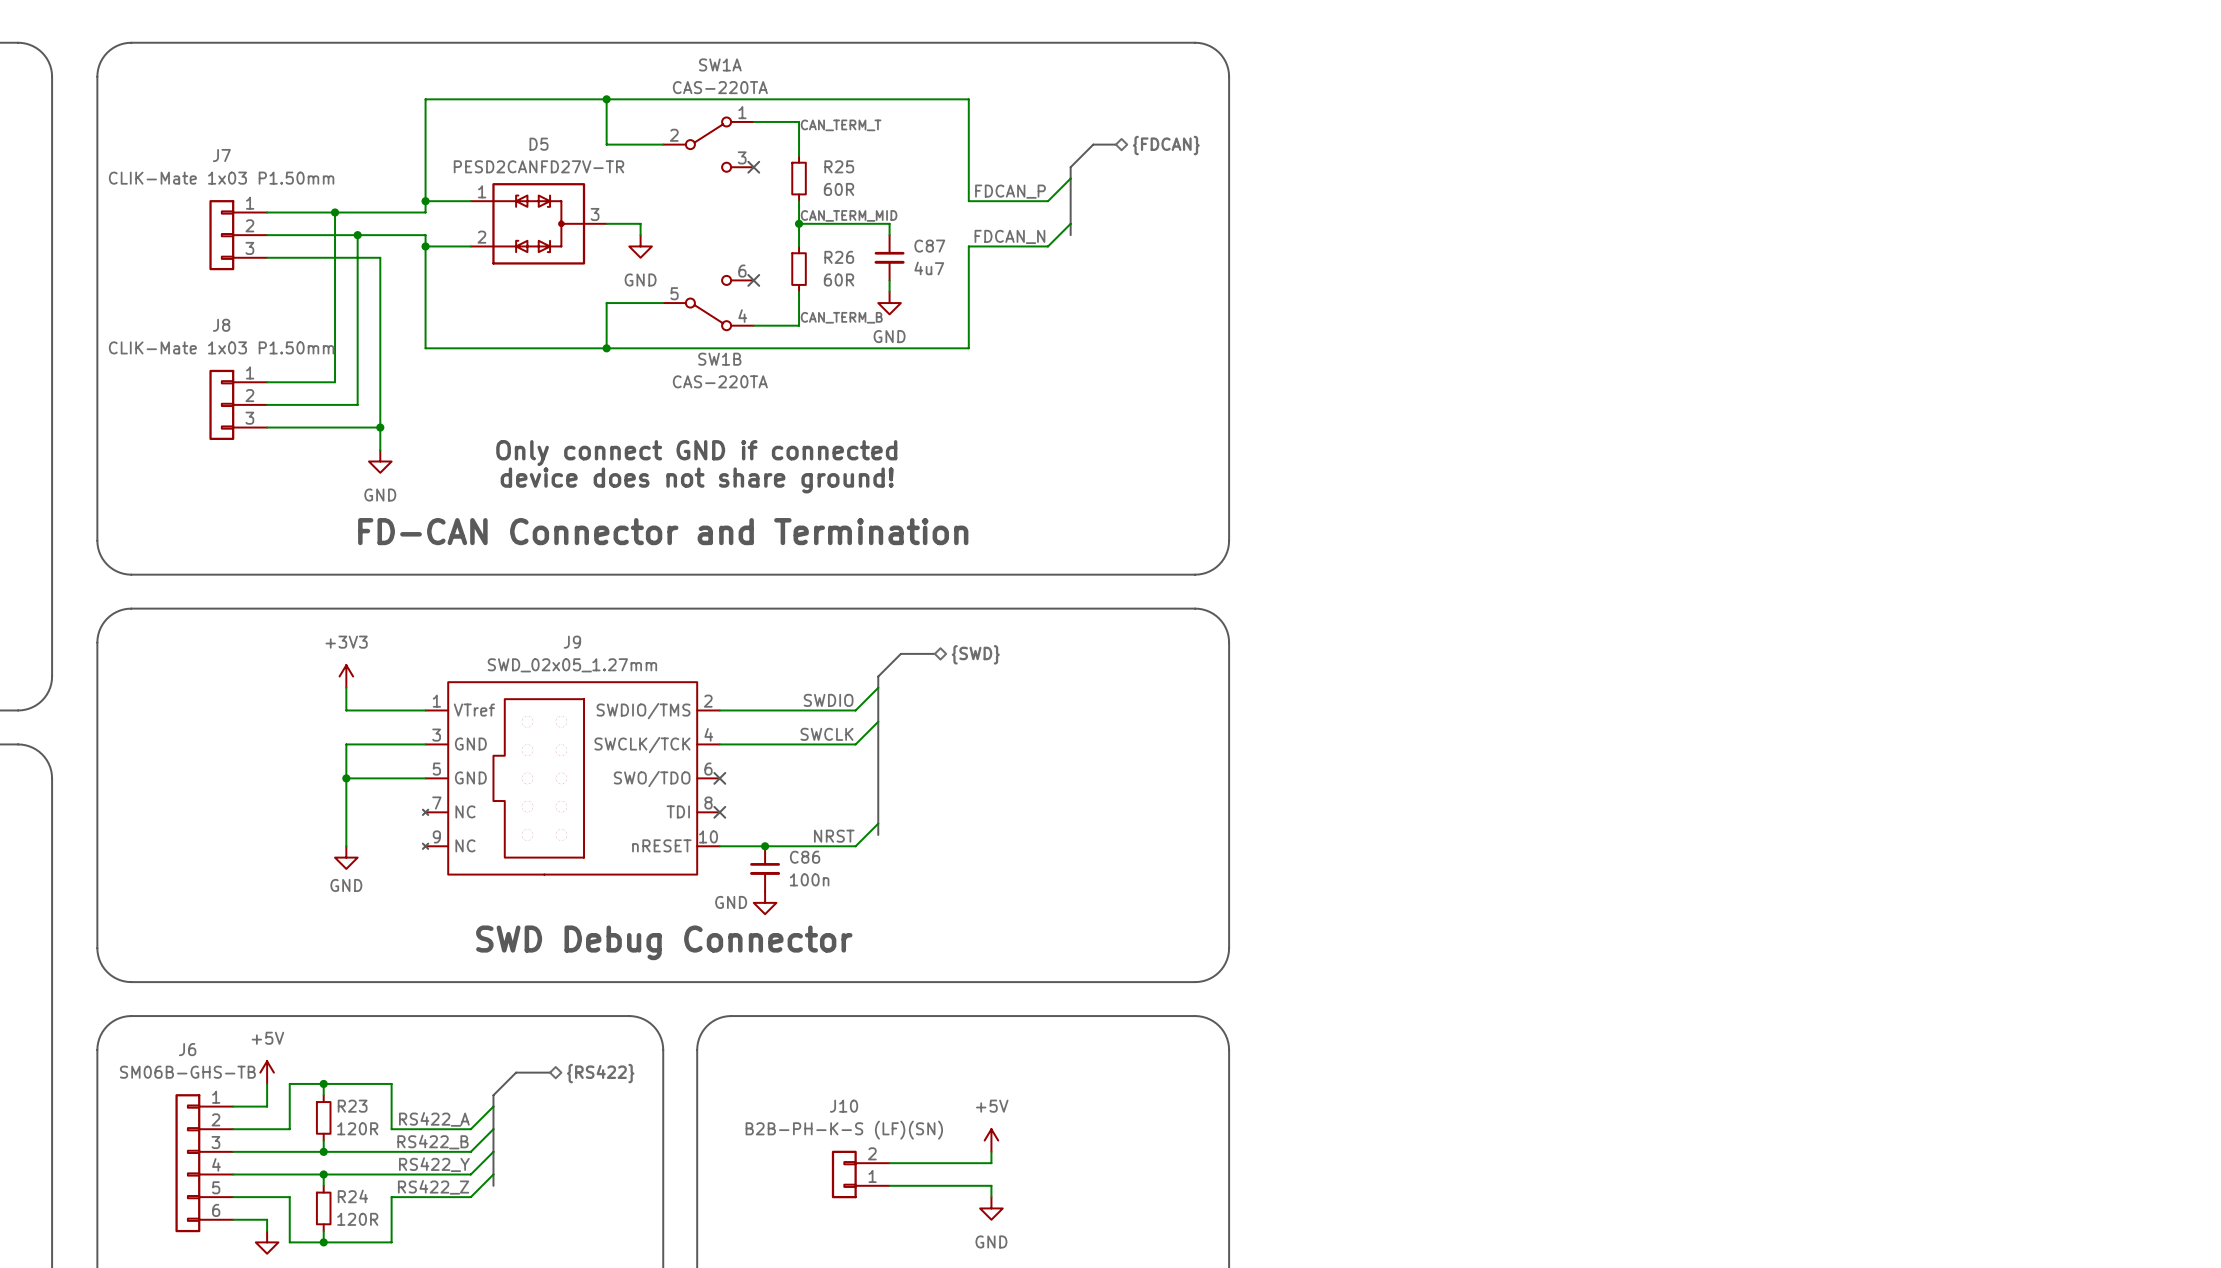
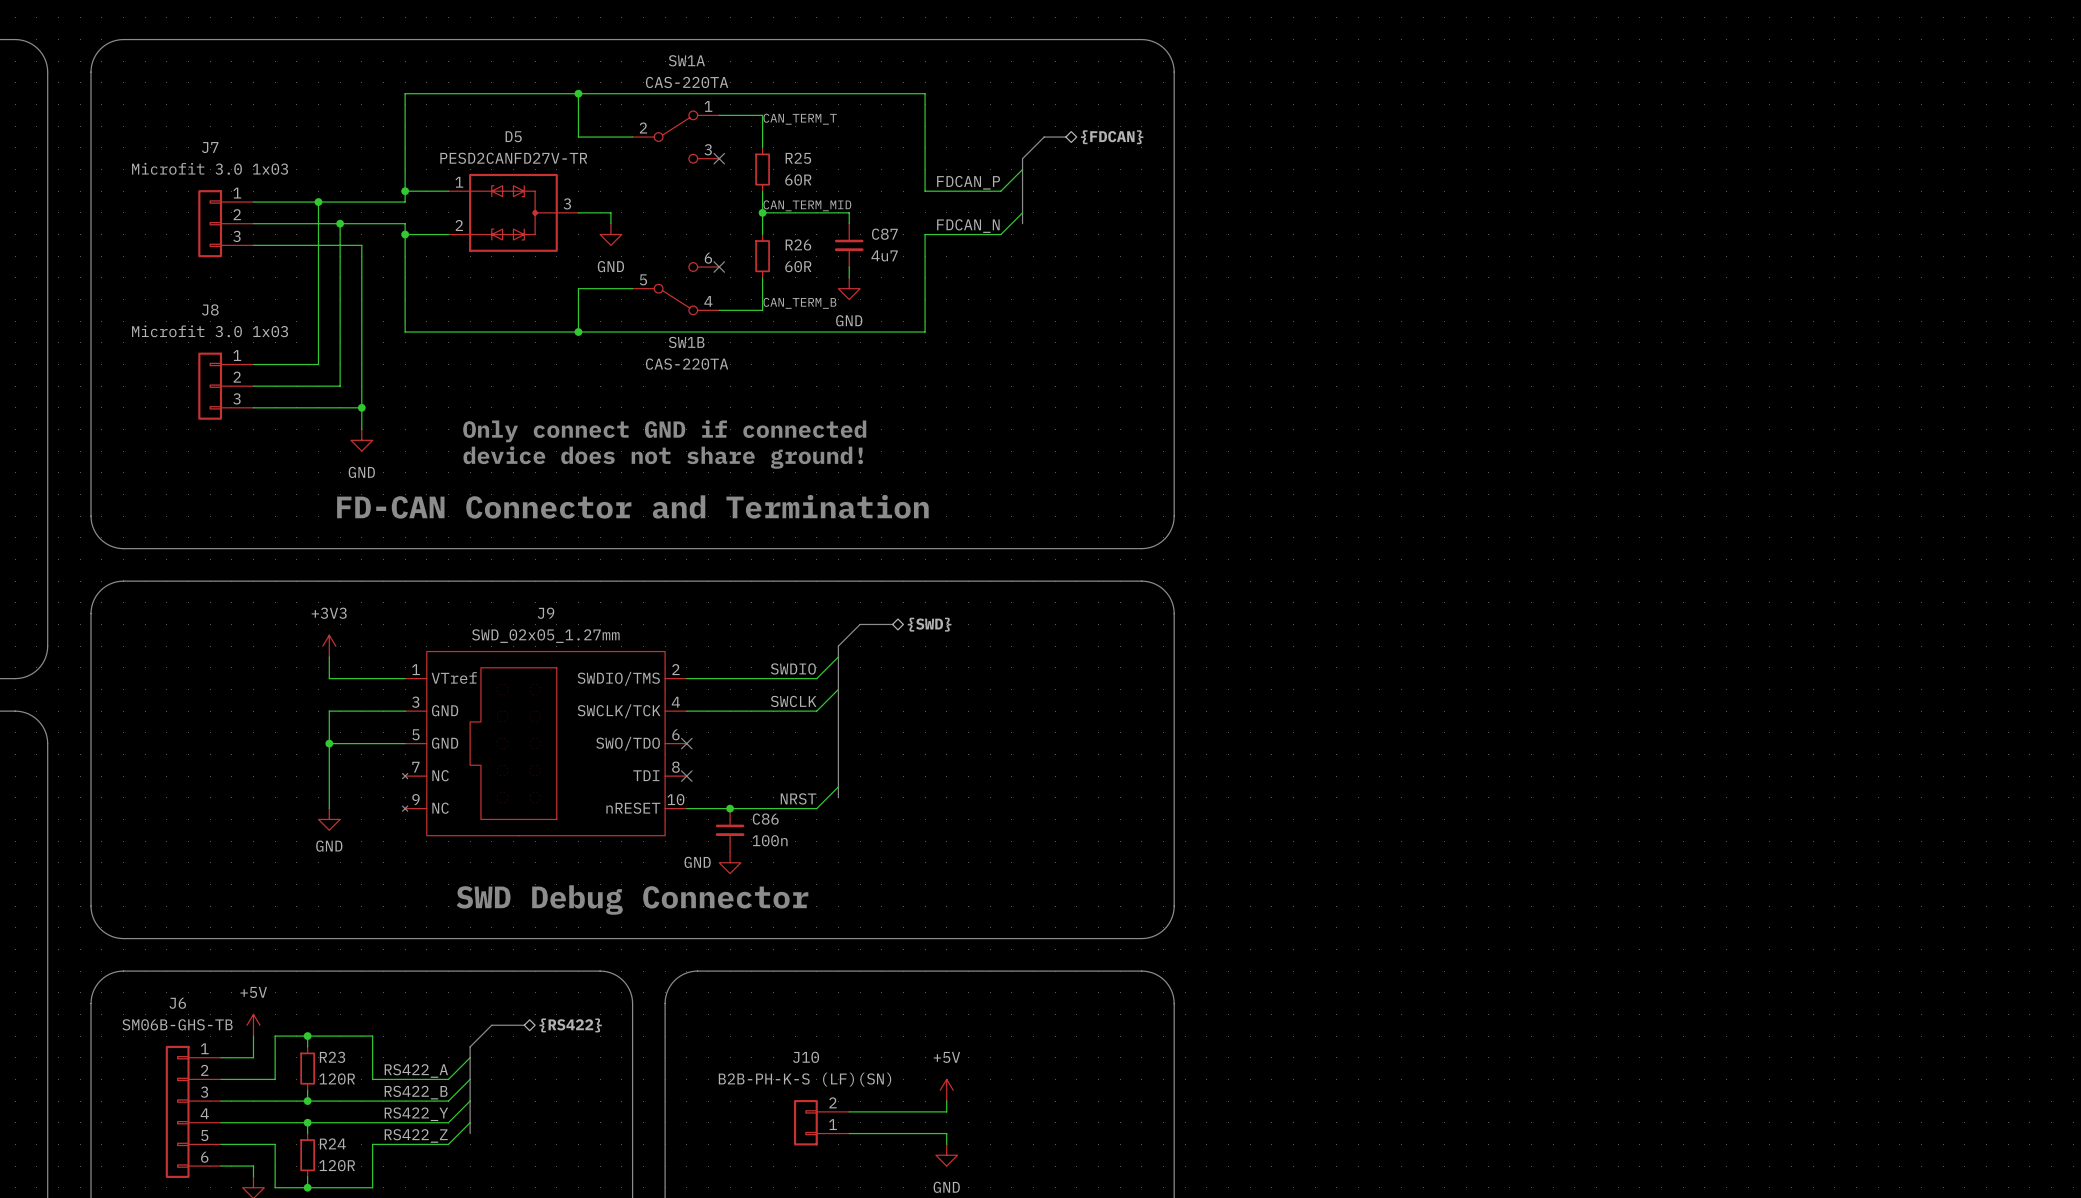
J7 value: CLIK-Mate 1x03 P1.50mm (221, 178) -> Microfit 3.0 1x03 (210, 168)
J8 value: CLIK-Mate 1x03 P1.50mm (221, 347) -> Microfit 3.0 1x03 (210, 331)

